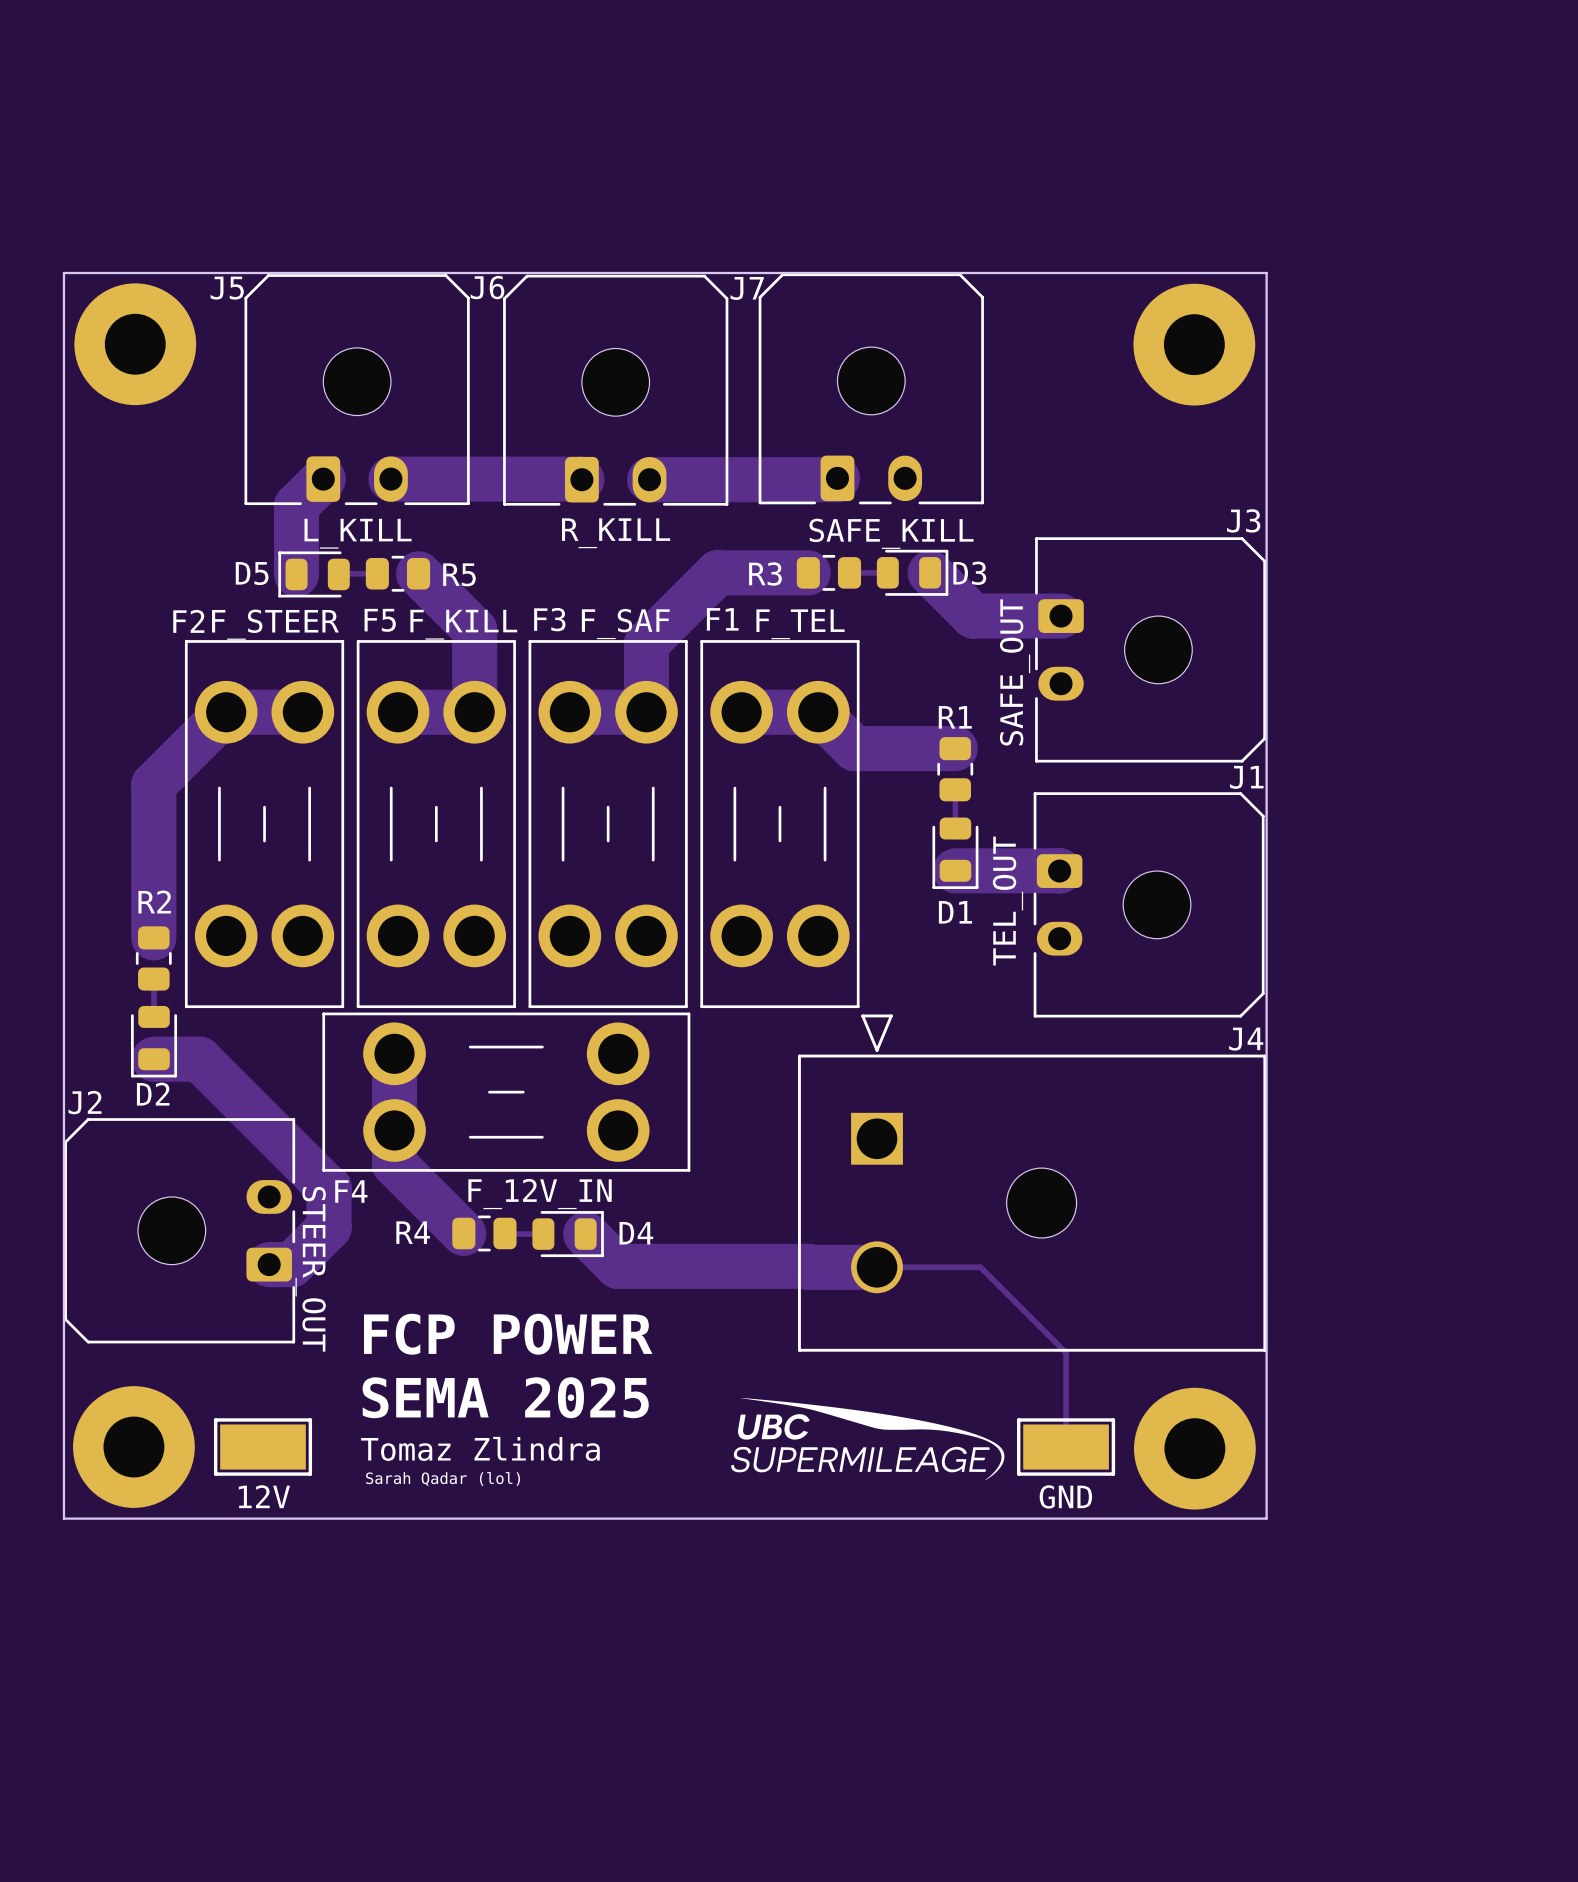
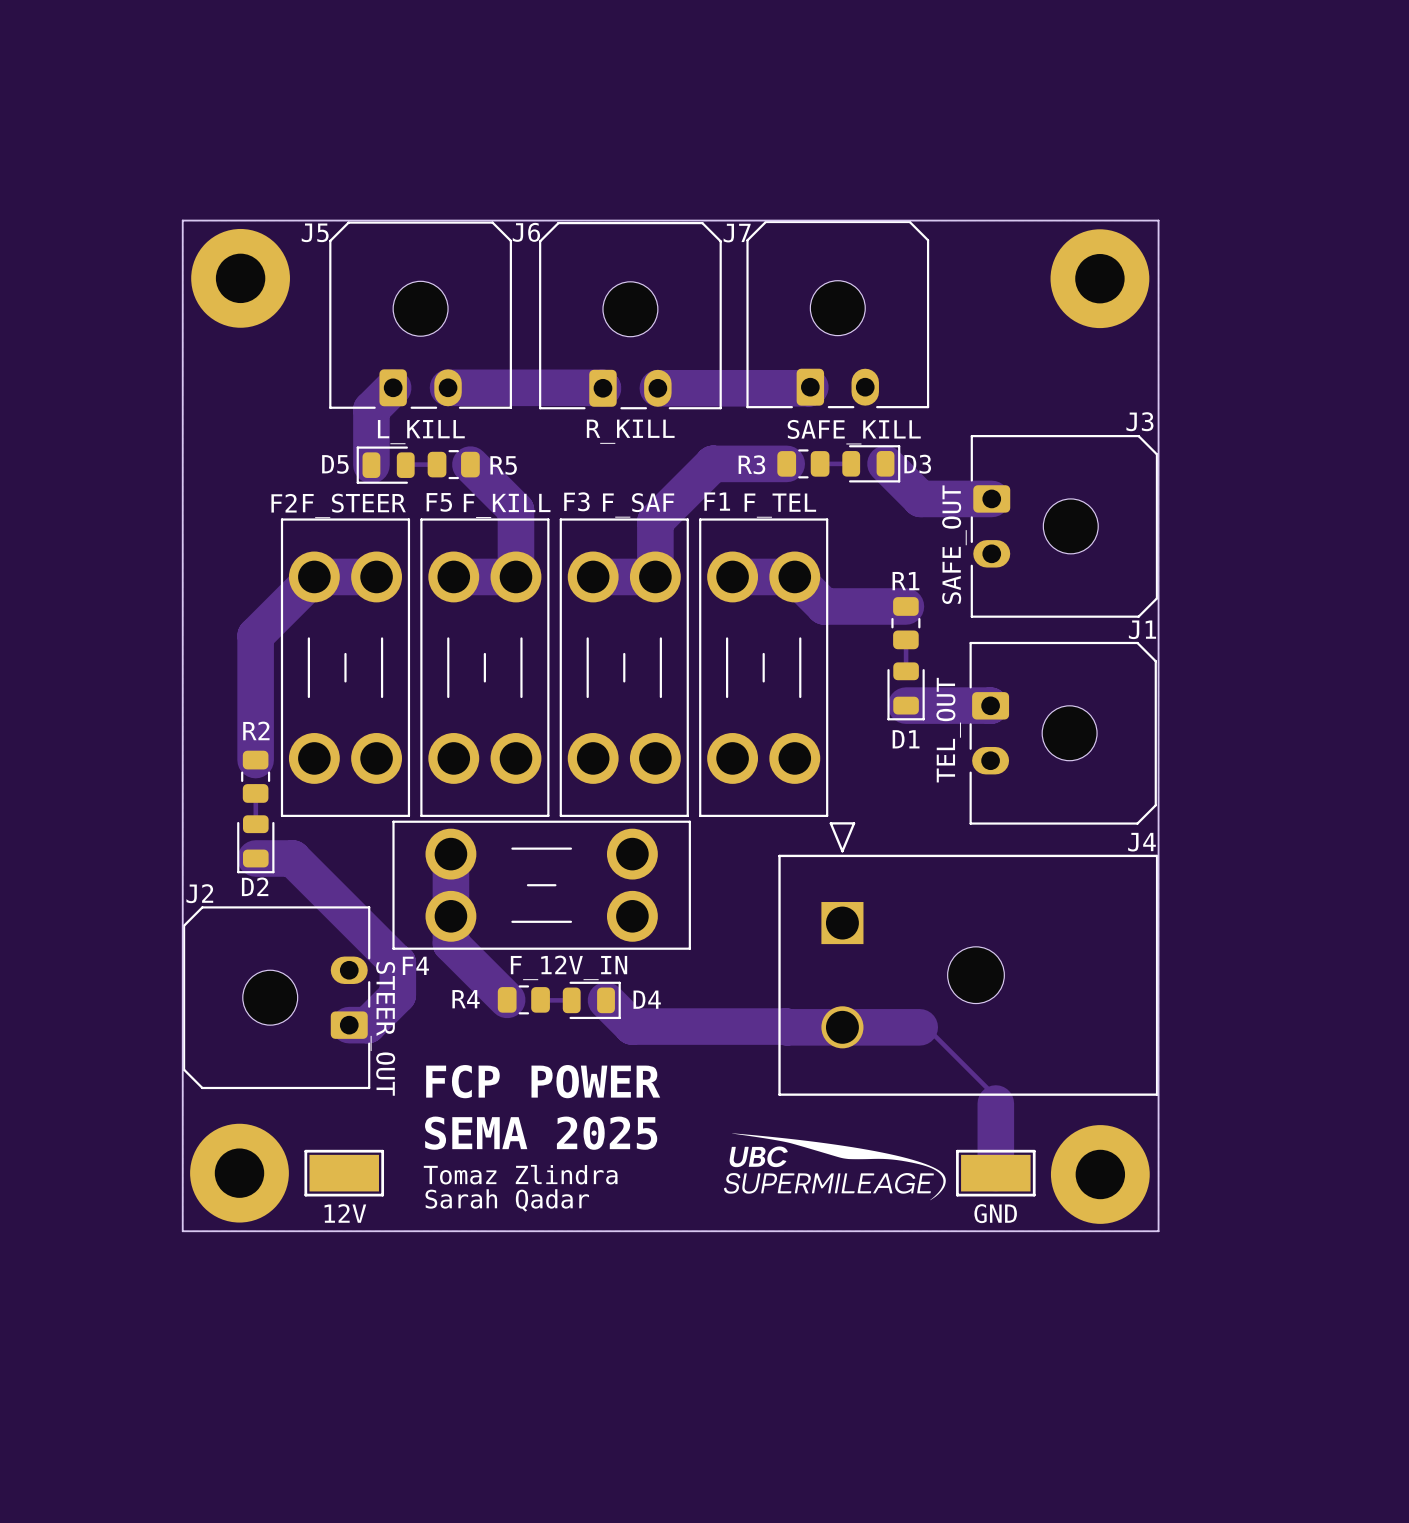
track width: thin (877, 1267) (972, 1267) -> thick (842, 1027) (919, 1027)
track width: thin (1066, 1361) (1066, 1447) -> thick (995, 1103) (995, 1173)
text: Sarah Qadar (lol) (443, 1479) -> Sarah Qadar (507, 1200)

